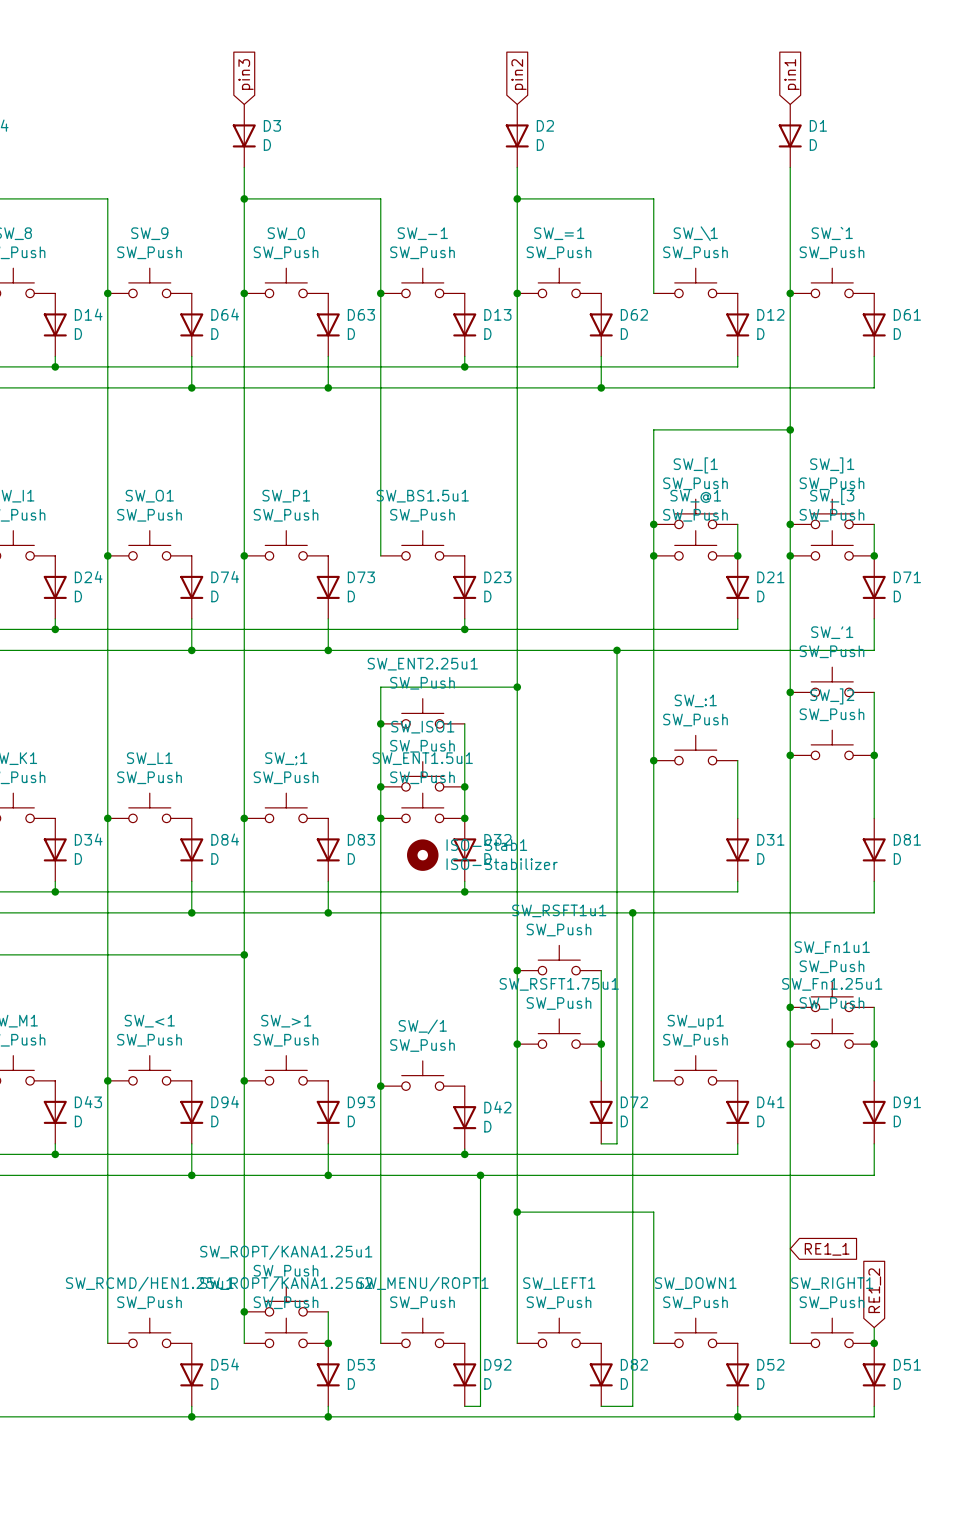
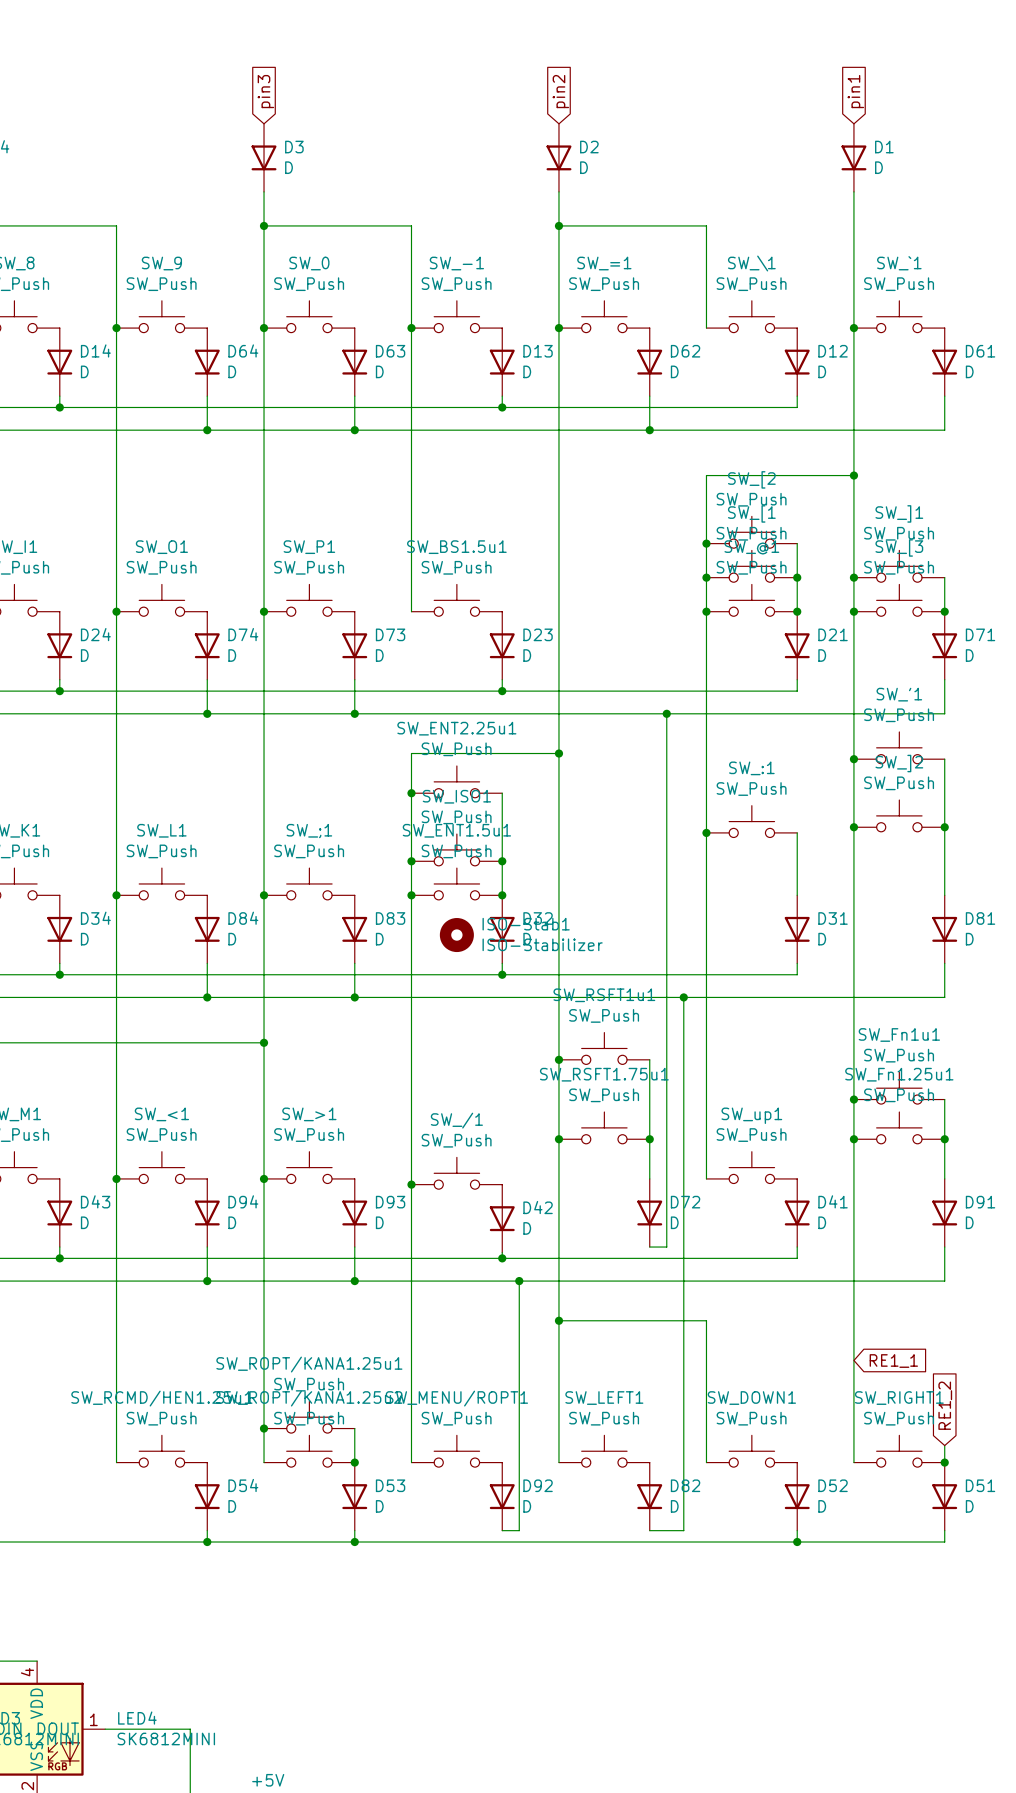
SW_[2: none -> SW_Push (751, 532)
junction: none -> (706, 543)
wire: none -> (797, 543) (797, 577)
junction: none -> (797, 577)

